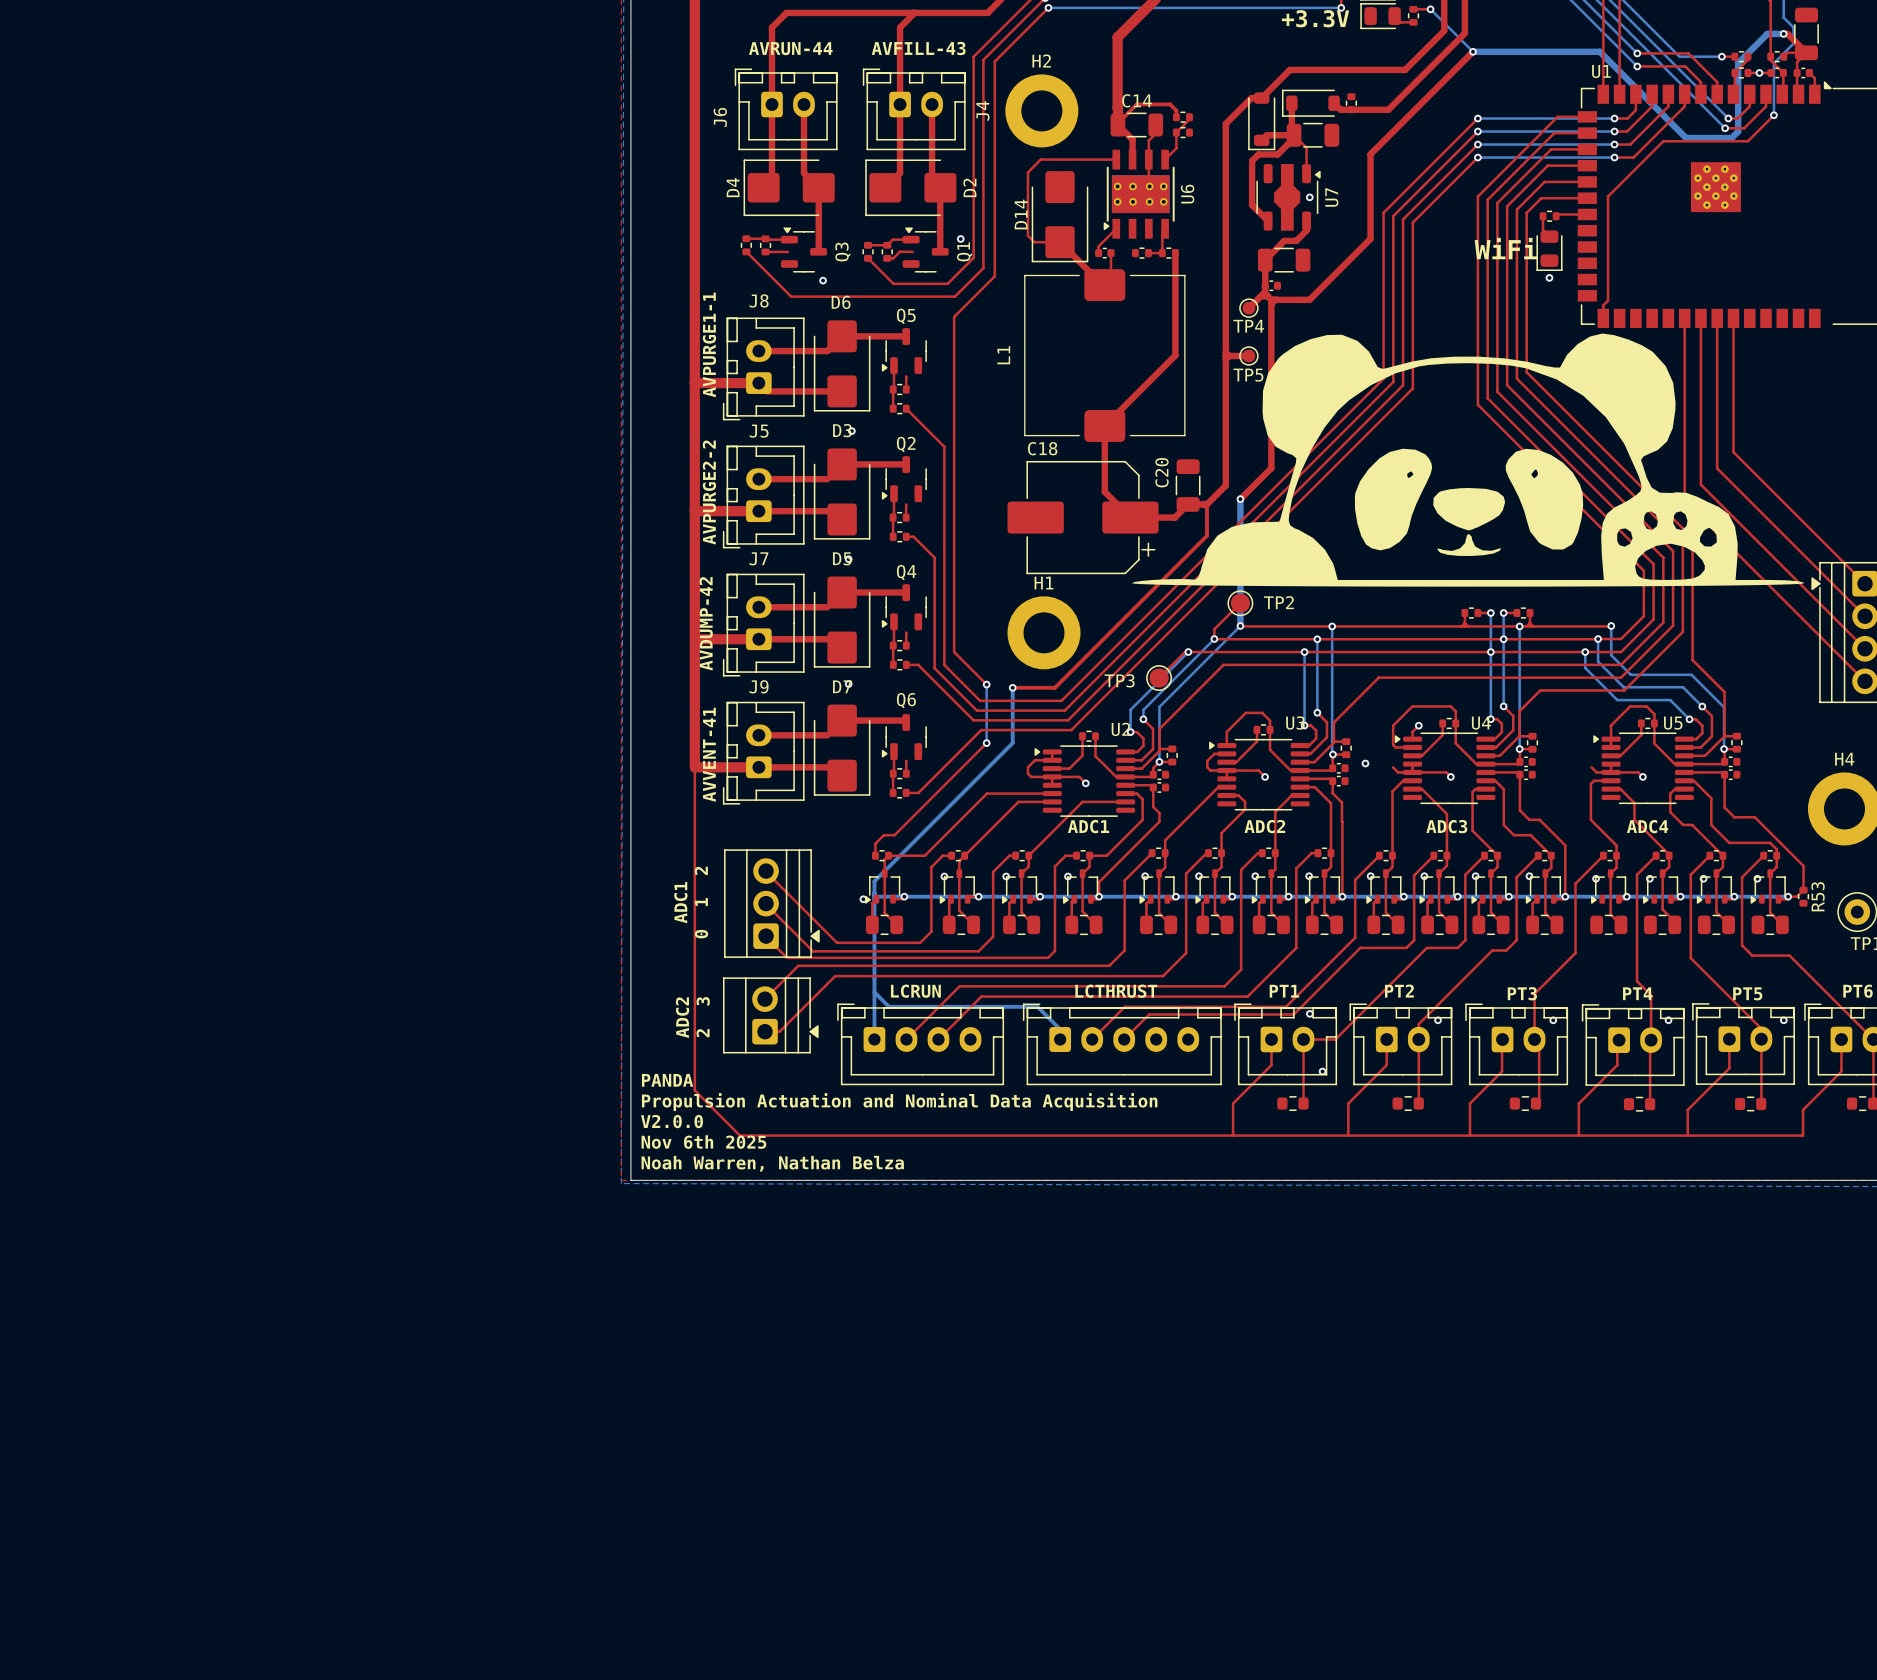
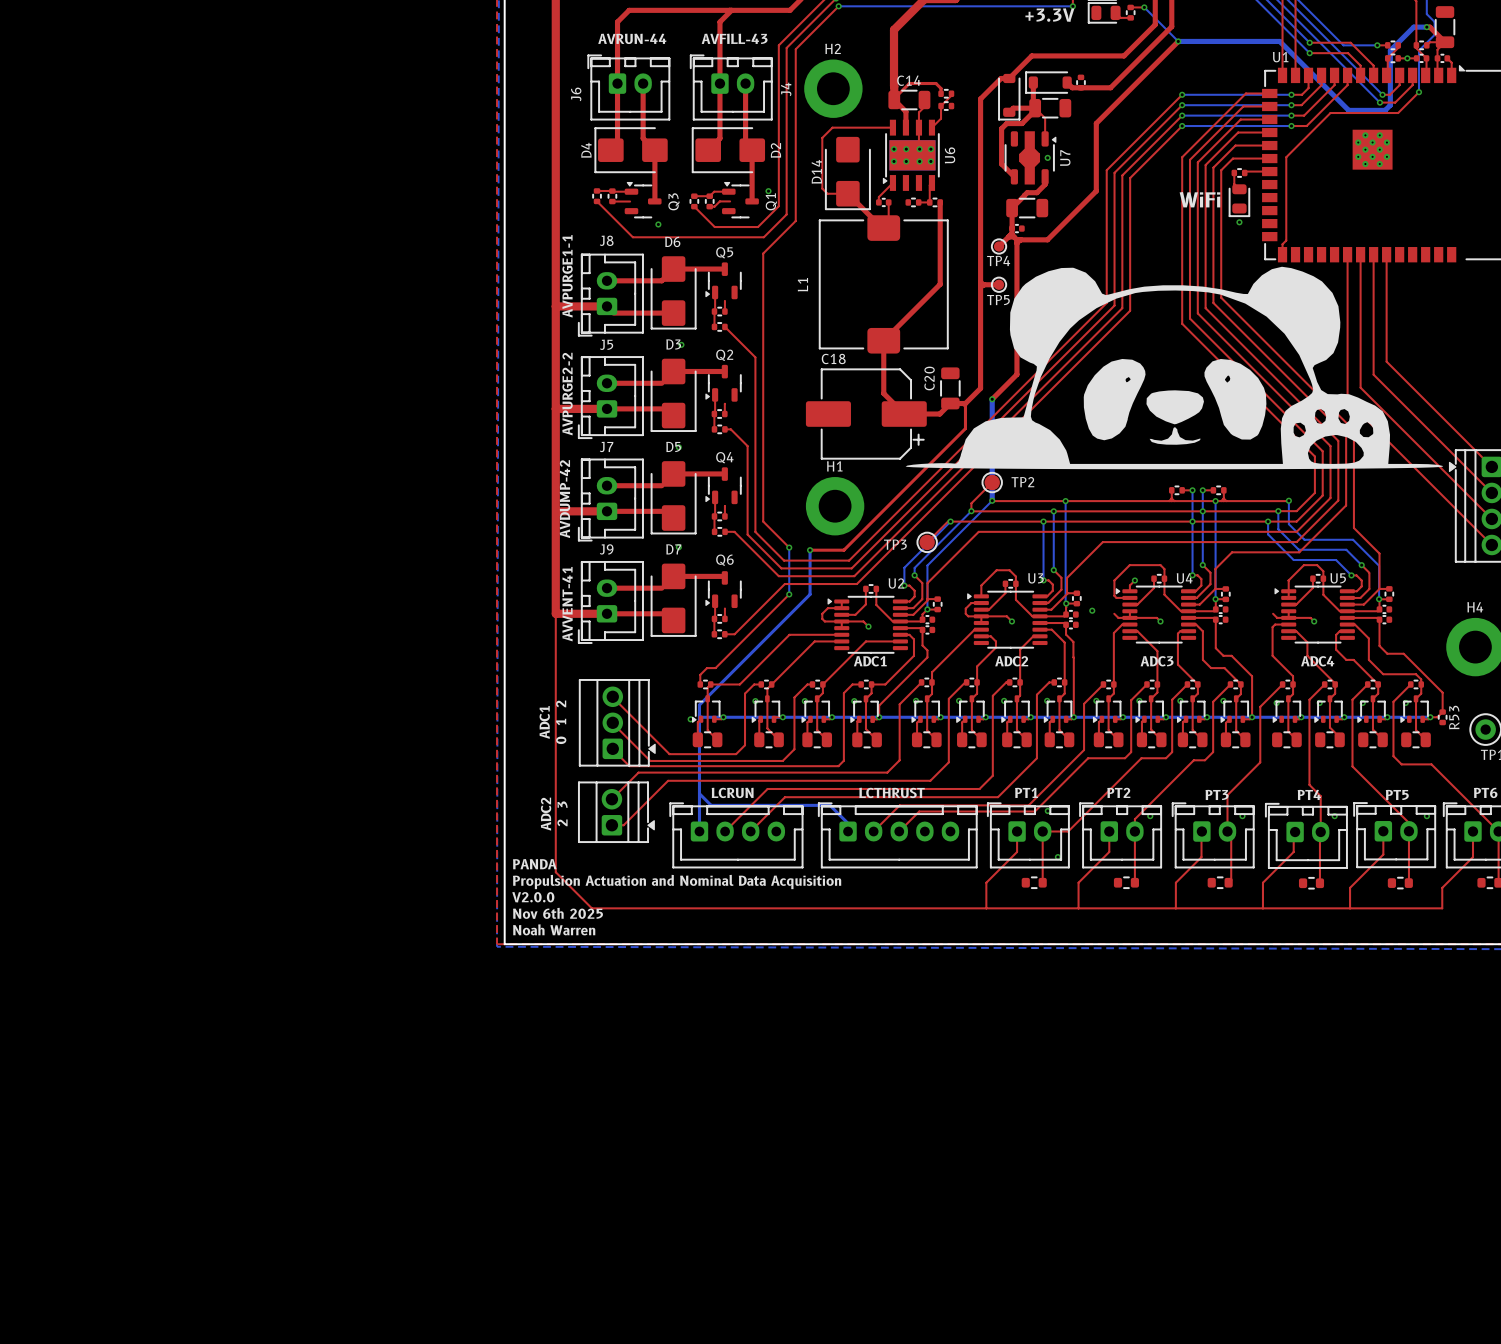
text: Noah Warren, Nathan Belza (772, 1163) -> Noah Warren (554, 929)

